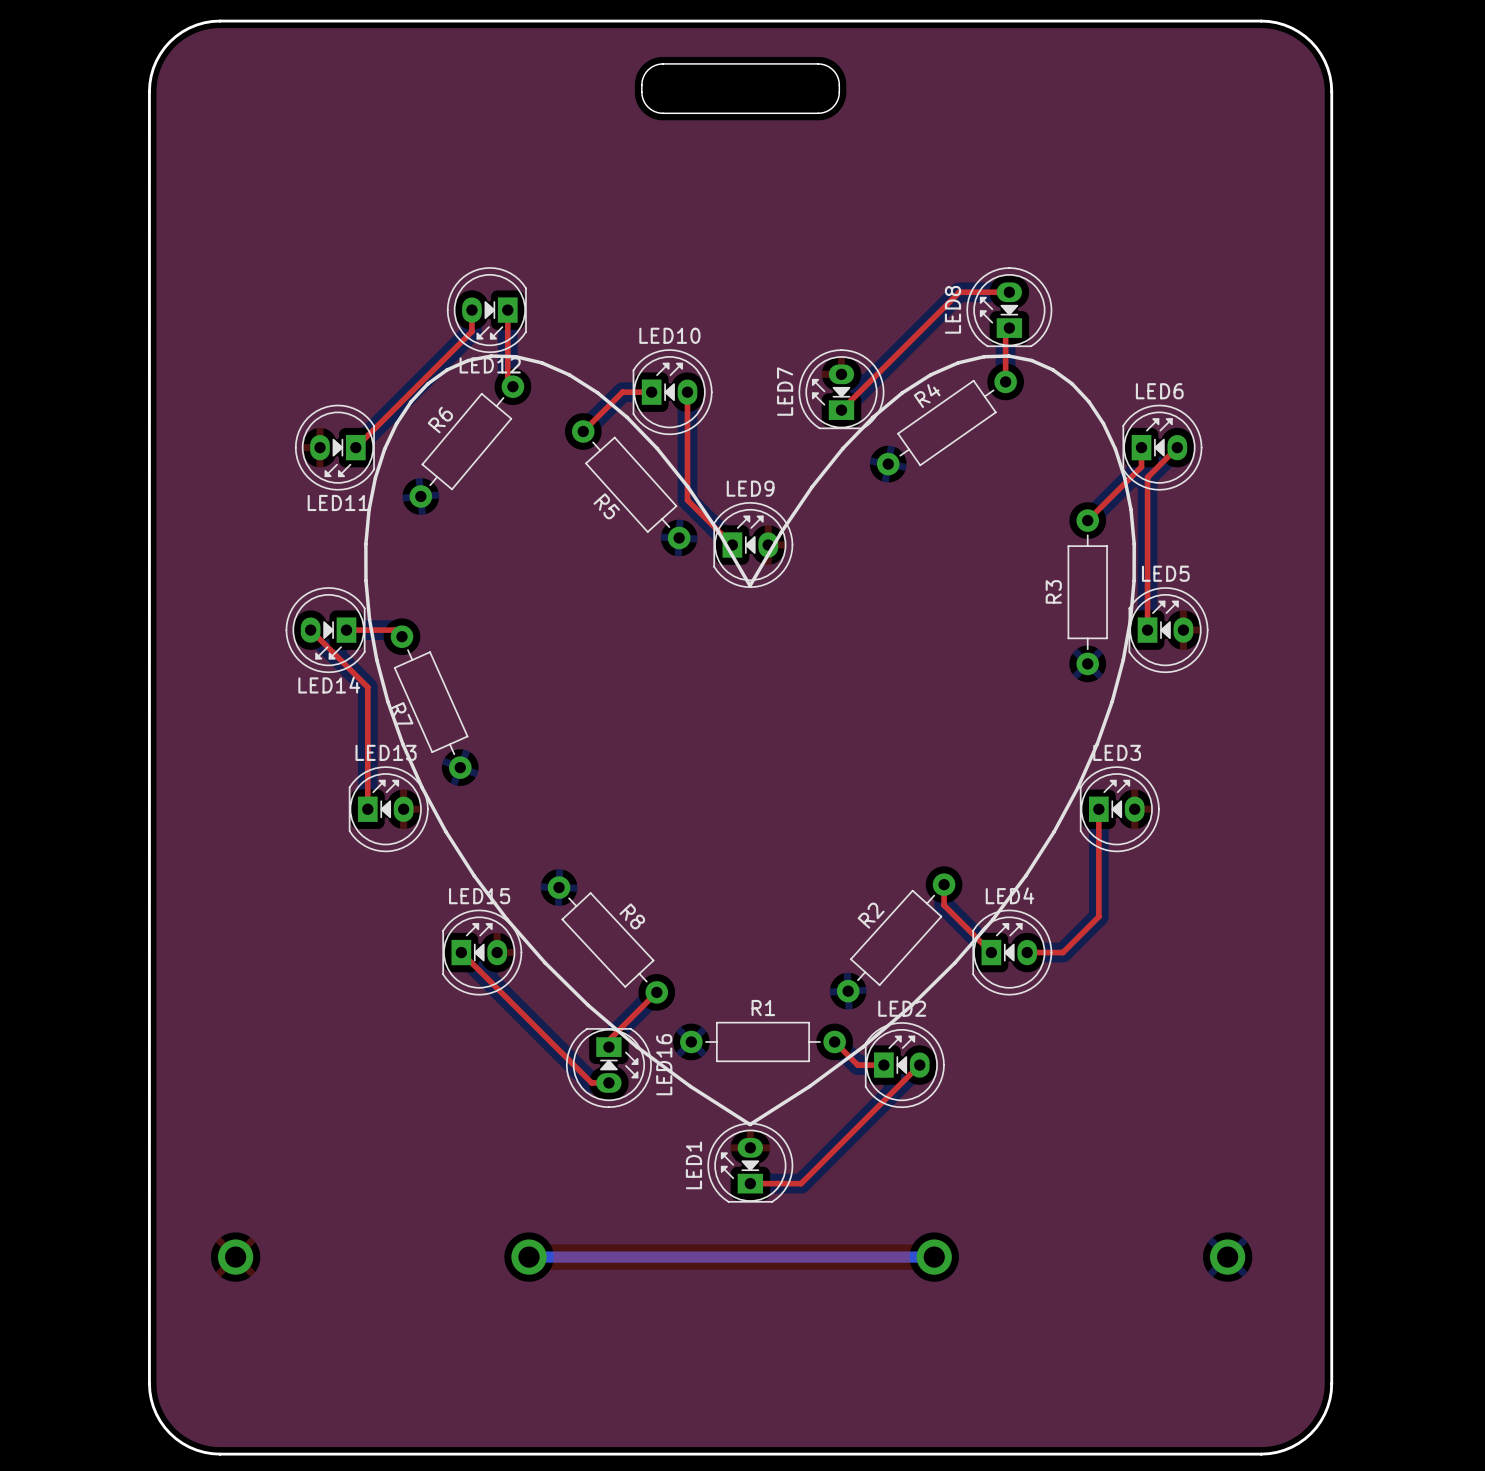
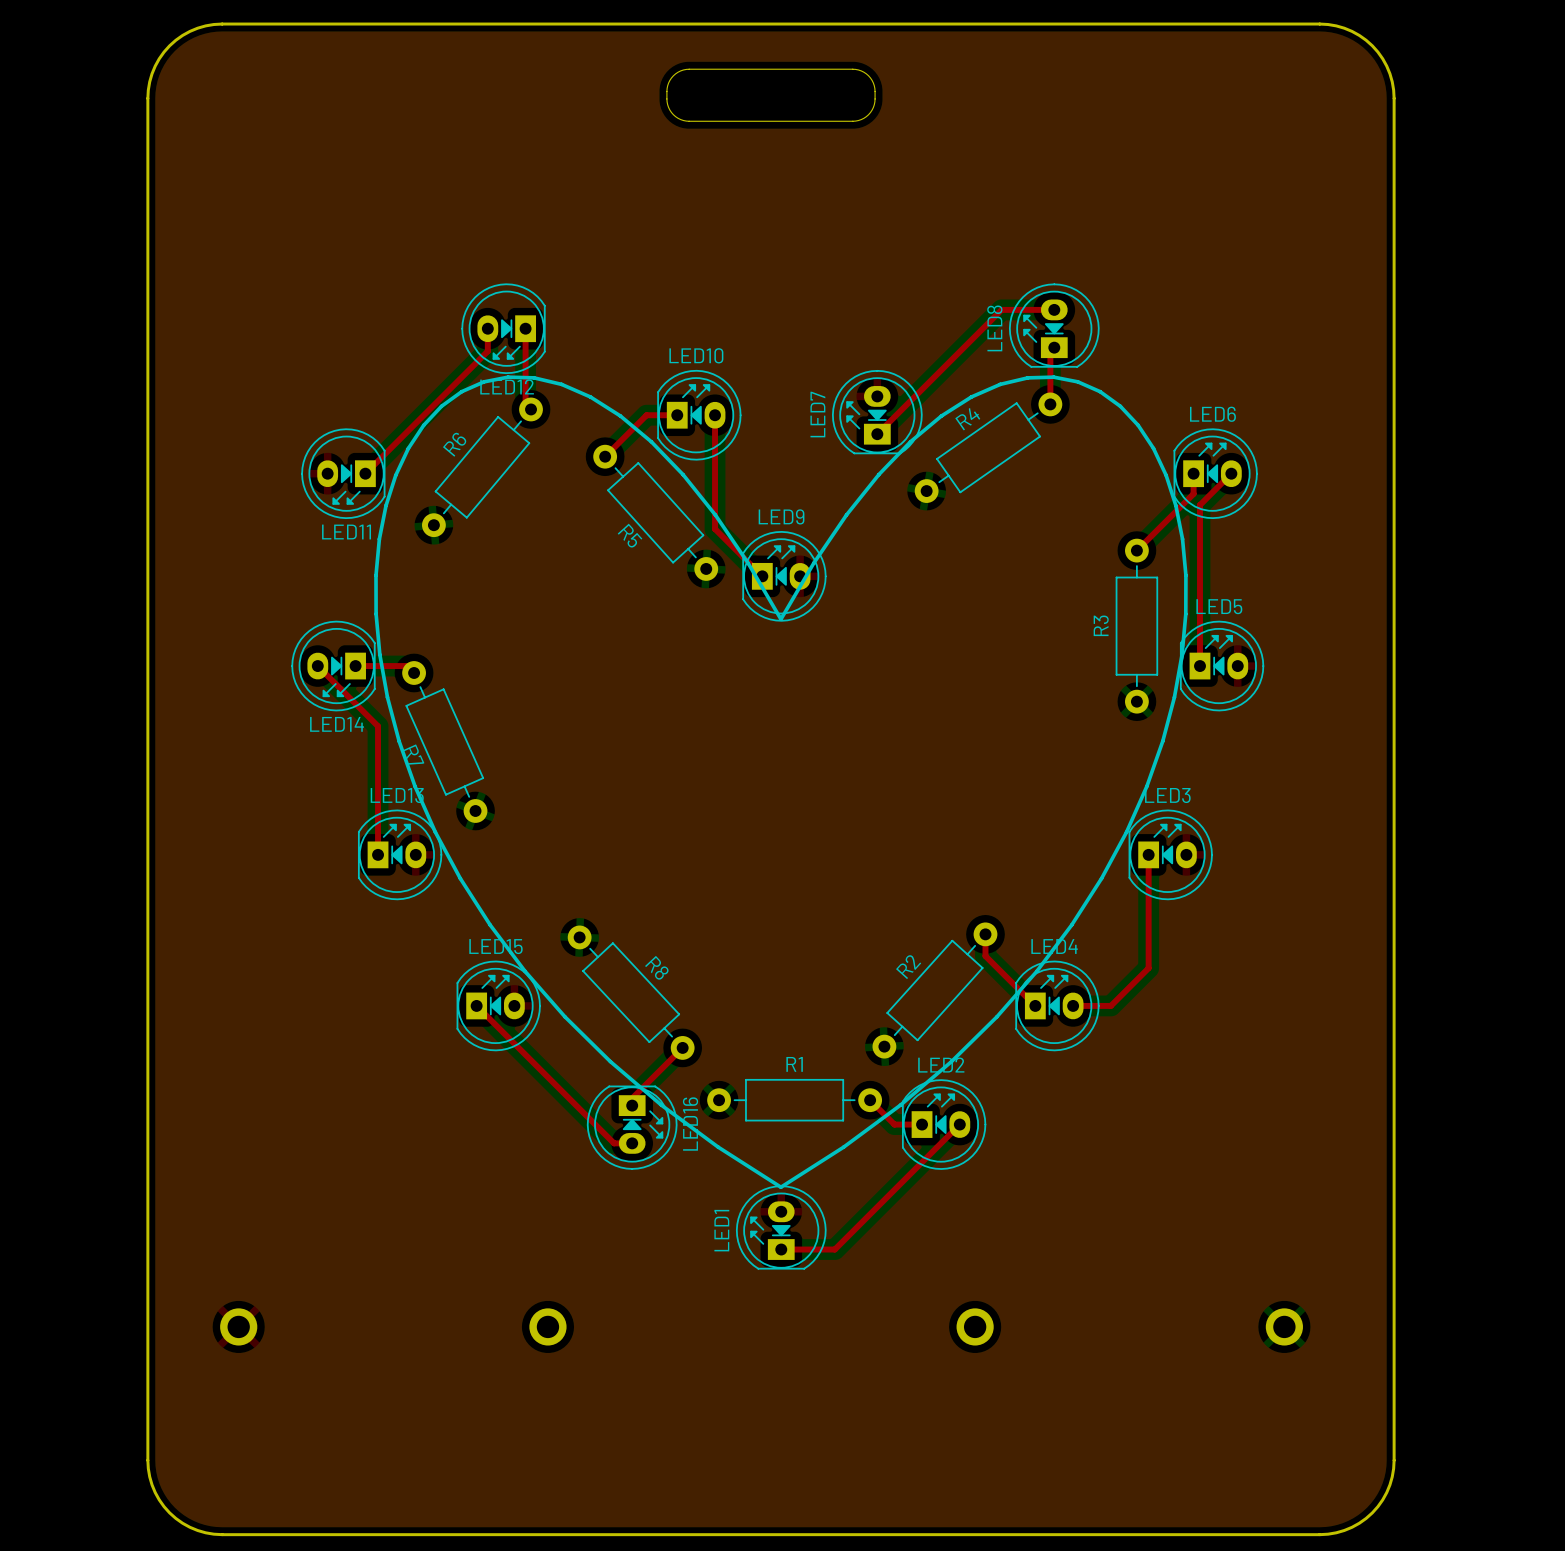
bottom track: (529, 1257) (934, 1257) -> none

